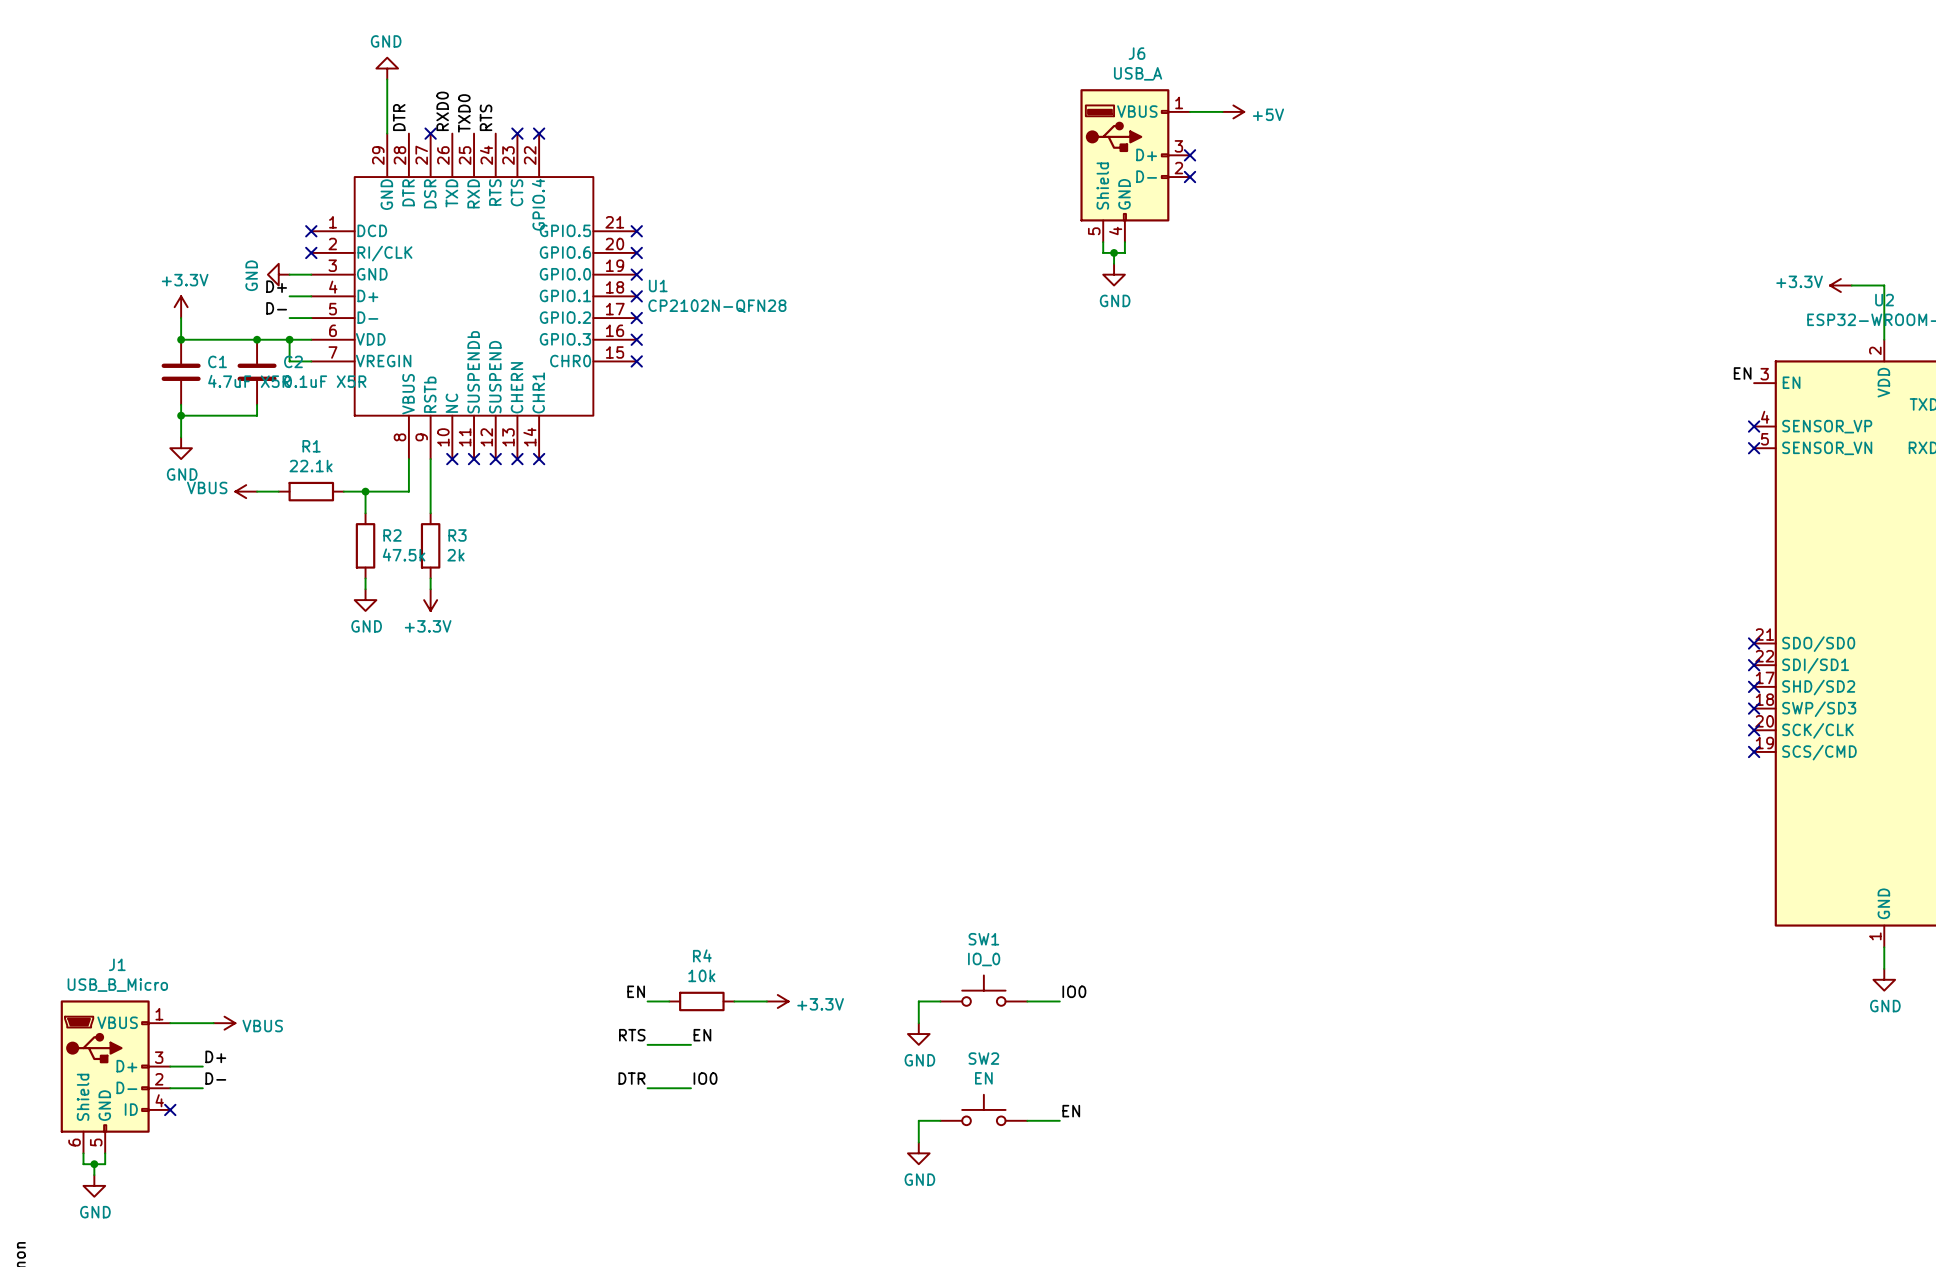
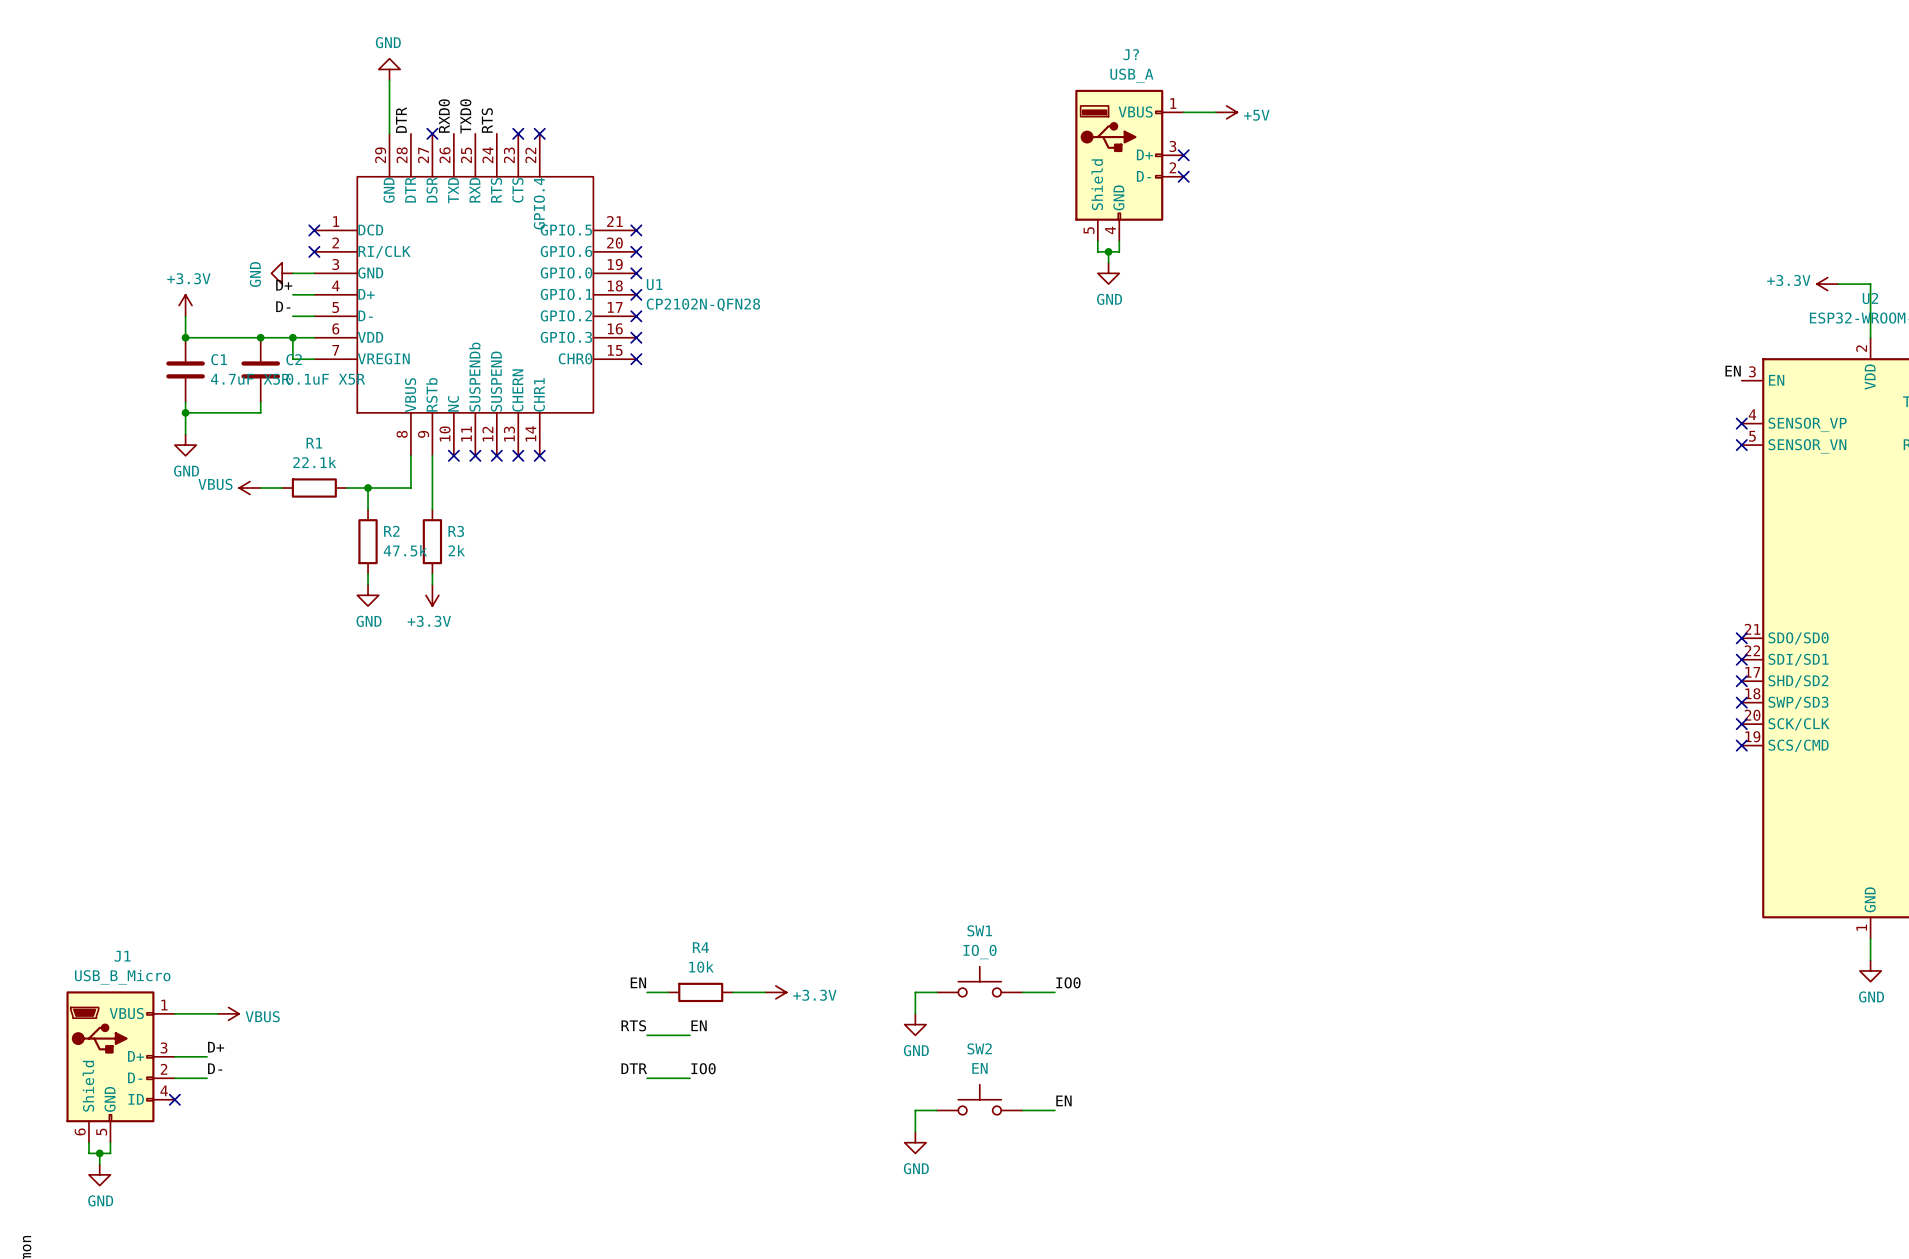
J6 name: J6 (1137, 53) -> J? (1131, 54)

